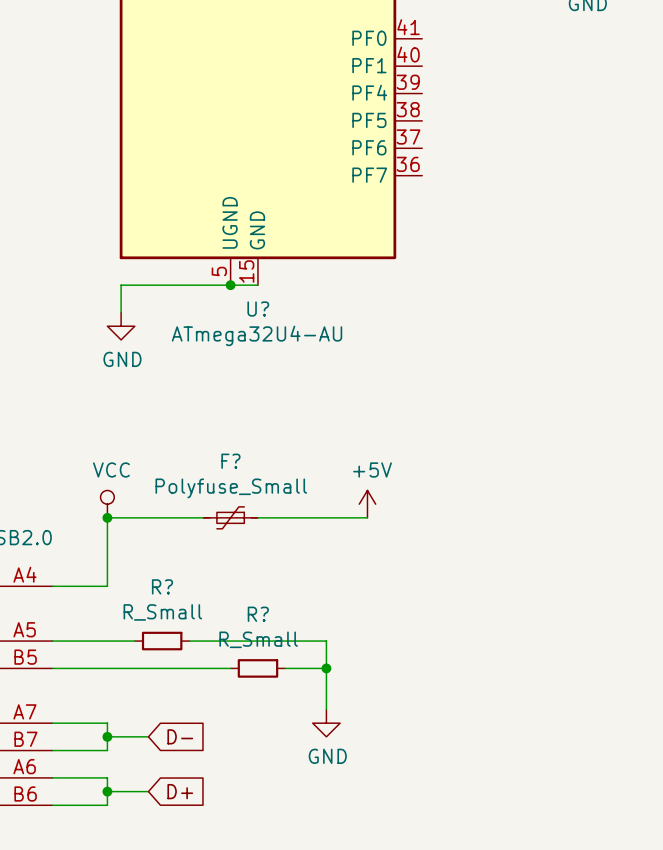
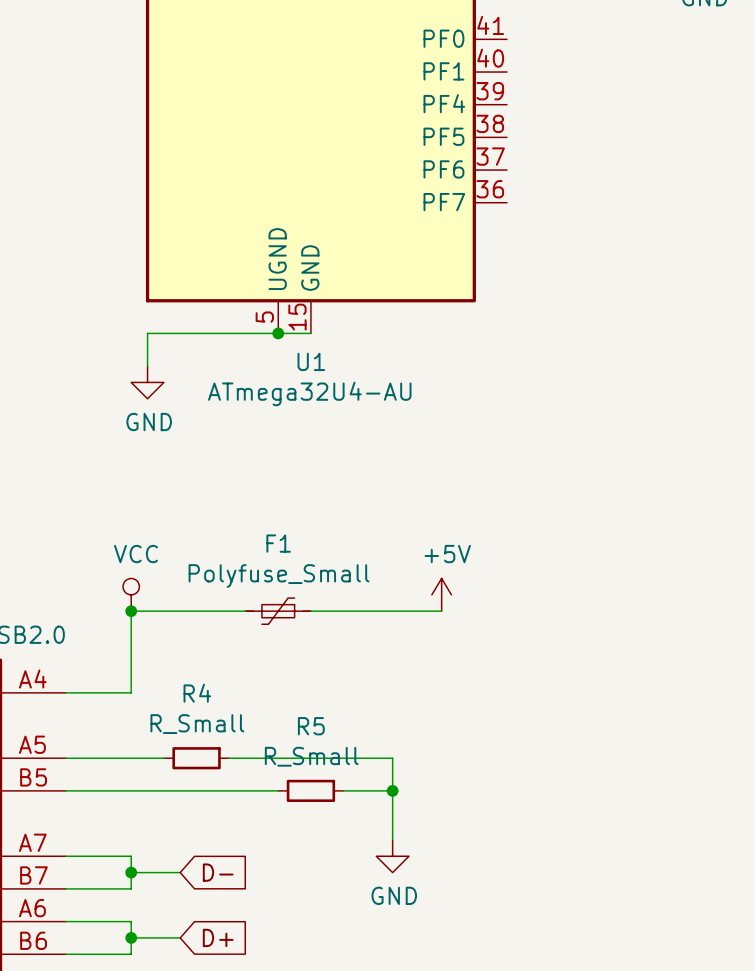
U? name: U? (258, 309) -> U1 (311, 361)
F? name: F? (230, 461) -> F1 (278, 543)
R? name: R? (162, 586) -> R4 (197, 693)
R? name: R? (258, 614) -> R5 (311, 726)

